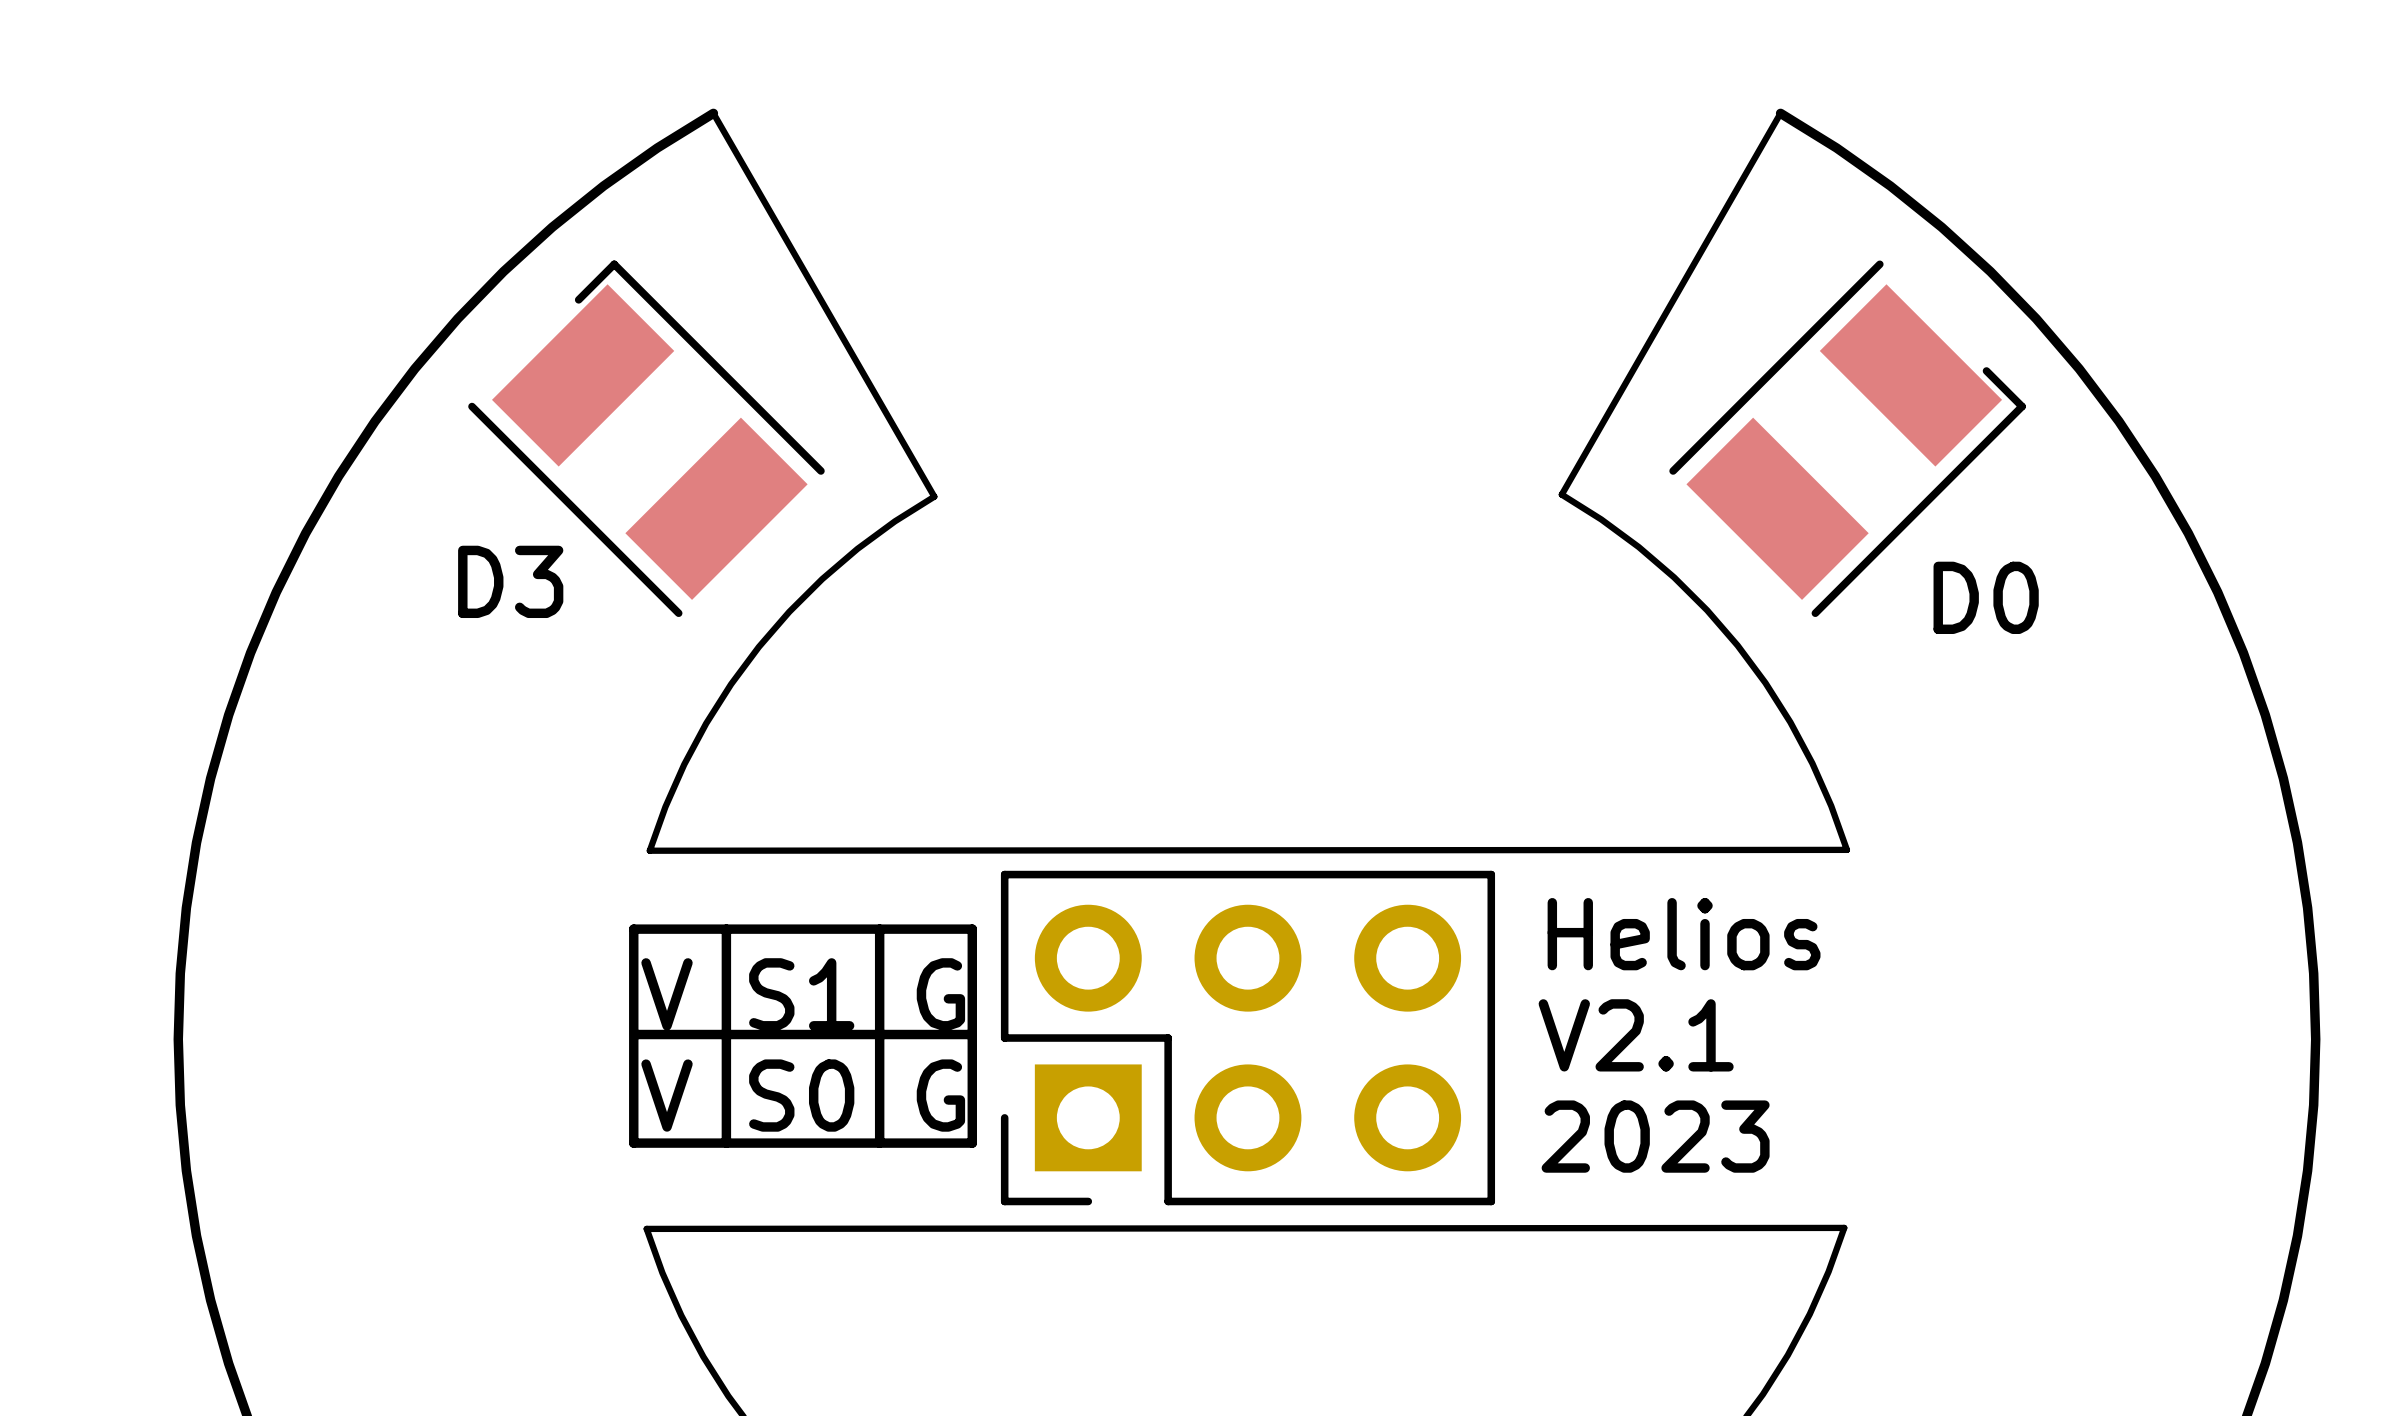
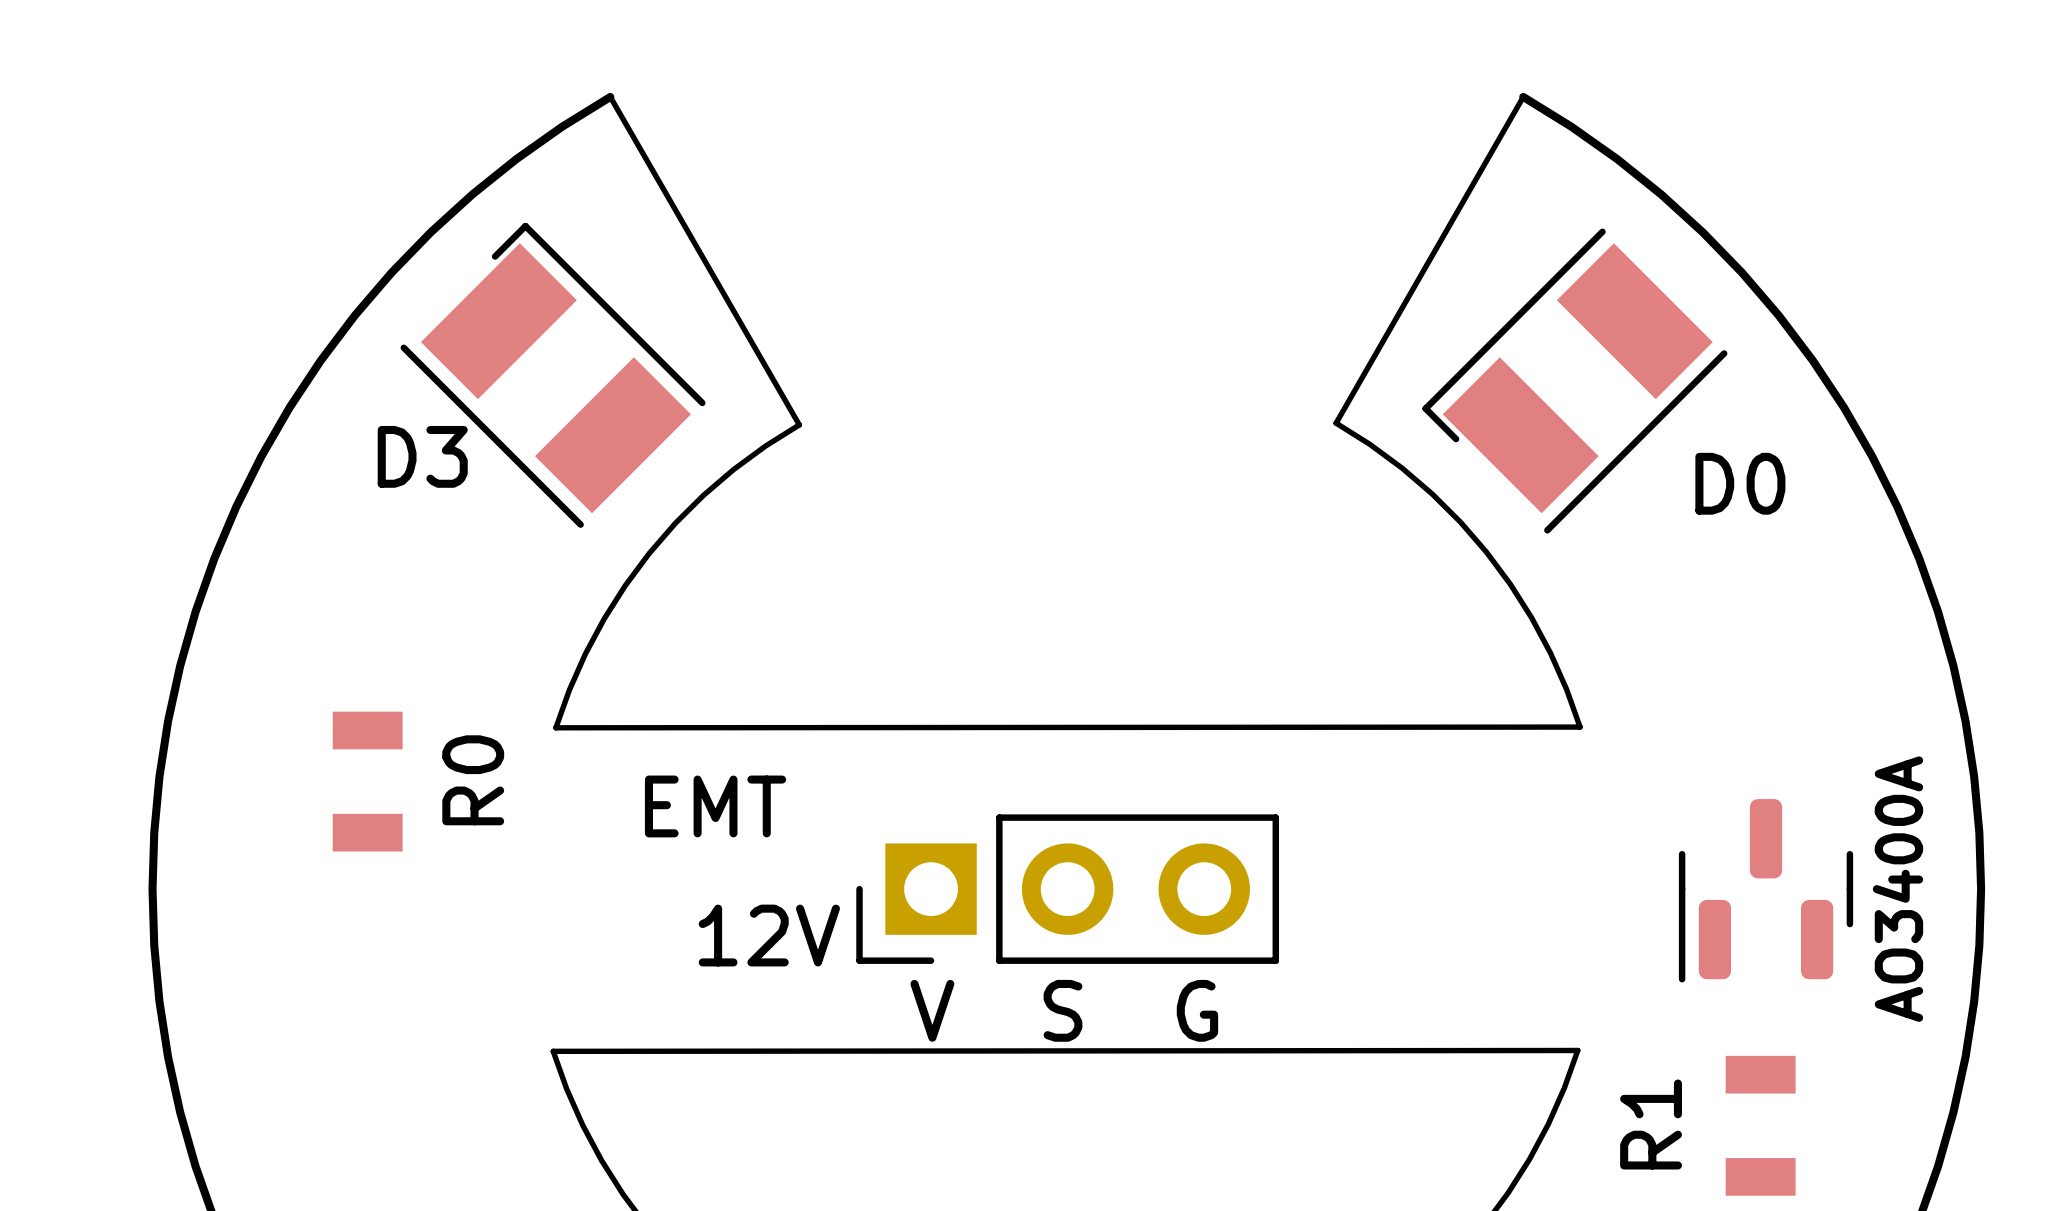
D0 rotation: 0° (1847, 438) -> 180° (1574, 381)
D3 name position: D3 (510, 581) -> D3 (422, 456)
part footprint: [1000, 870, 1496, 1206] -> [856, 814, 1280, 964]
R0: none -> (367, 781)
line: (633, 929) (972, 929) (972, 1143) (633, 1143) (633, 929) -> none
line: (726, 929) (726, 1143) -> none
line: (879, 929) (879, 1143) -> none
text: Helios (1684, 934) -> none
text: none -> EMT (715, 806)
text: V S1 G (803, 994) -> none
line: (636, 1034) (972, 1034) -> none
text: V2.1 (1636, 1035) -> none
part: none -> AO3400A (1766, 890)
text: none -> 12V (769, 935)
text: V S0 G (803, 1095) -> none
text: 2023 (1655, 1136) -> none
text: none -> V S G (1064, 1010)
R1: none -> (1760, 1125)

